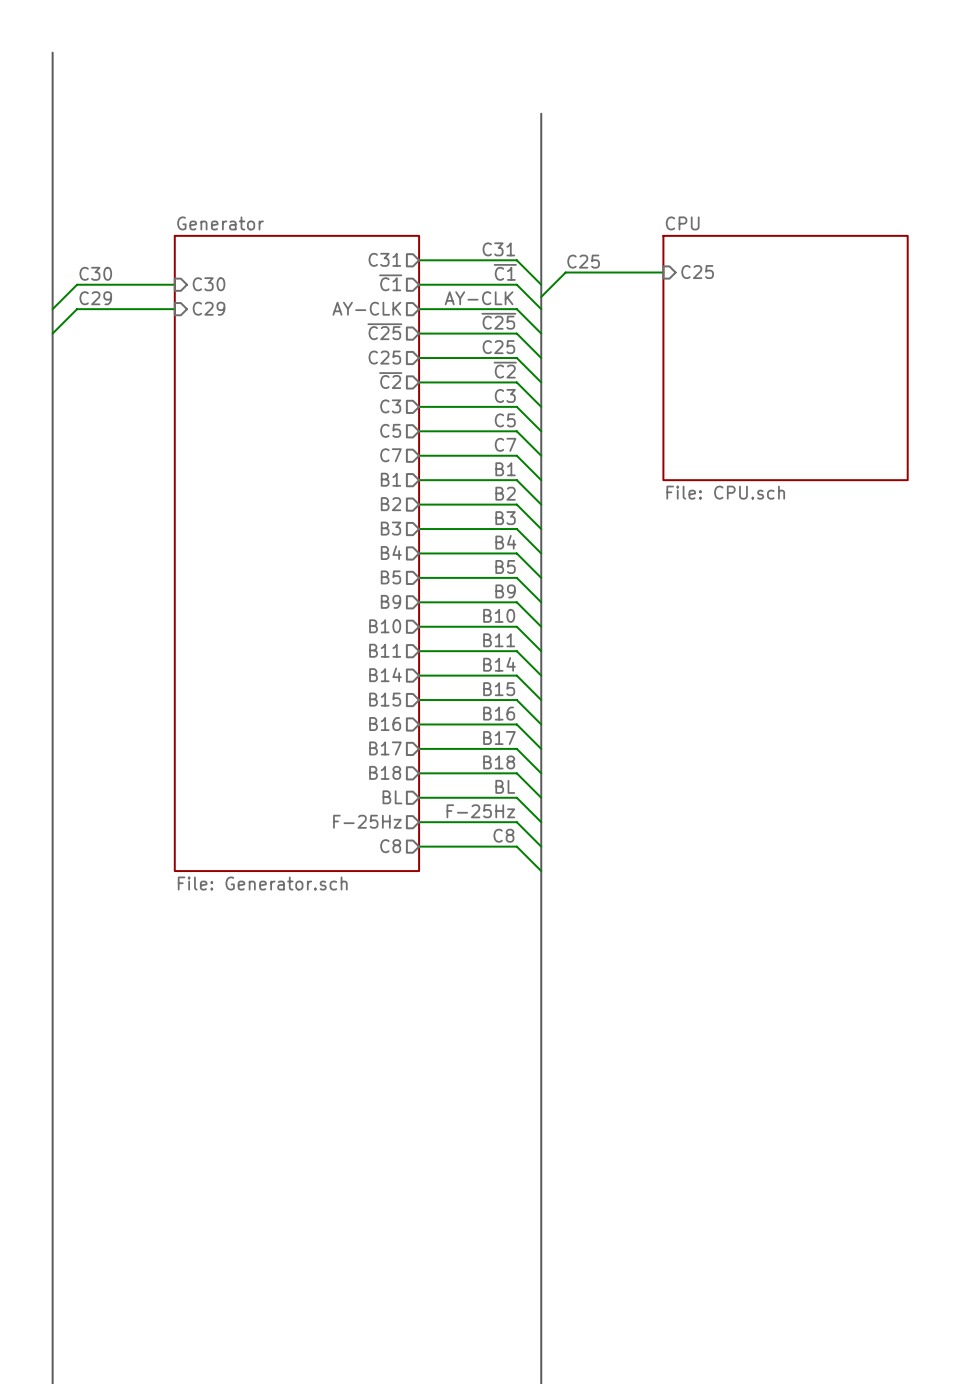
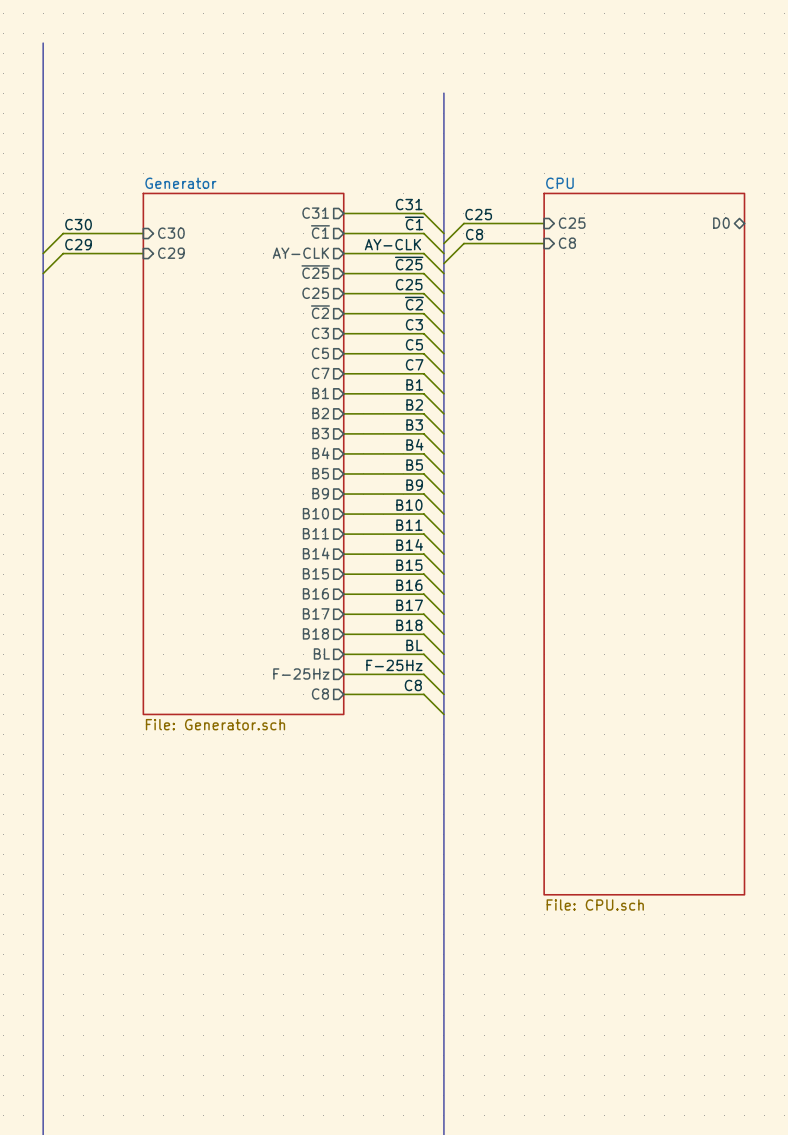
sheet pin: none -> D0 (721, 223)
label: none -> C8 (474, 234)
wire: none -> (544, 243) (463, 243) (443, 263)
sheet pin: none -> C8 (567, 243)
sheet CPU: File: CPU.sch (785, 358) -> none
sheet CPU: none -> File: CPU.sch (644, 544)

